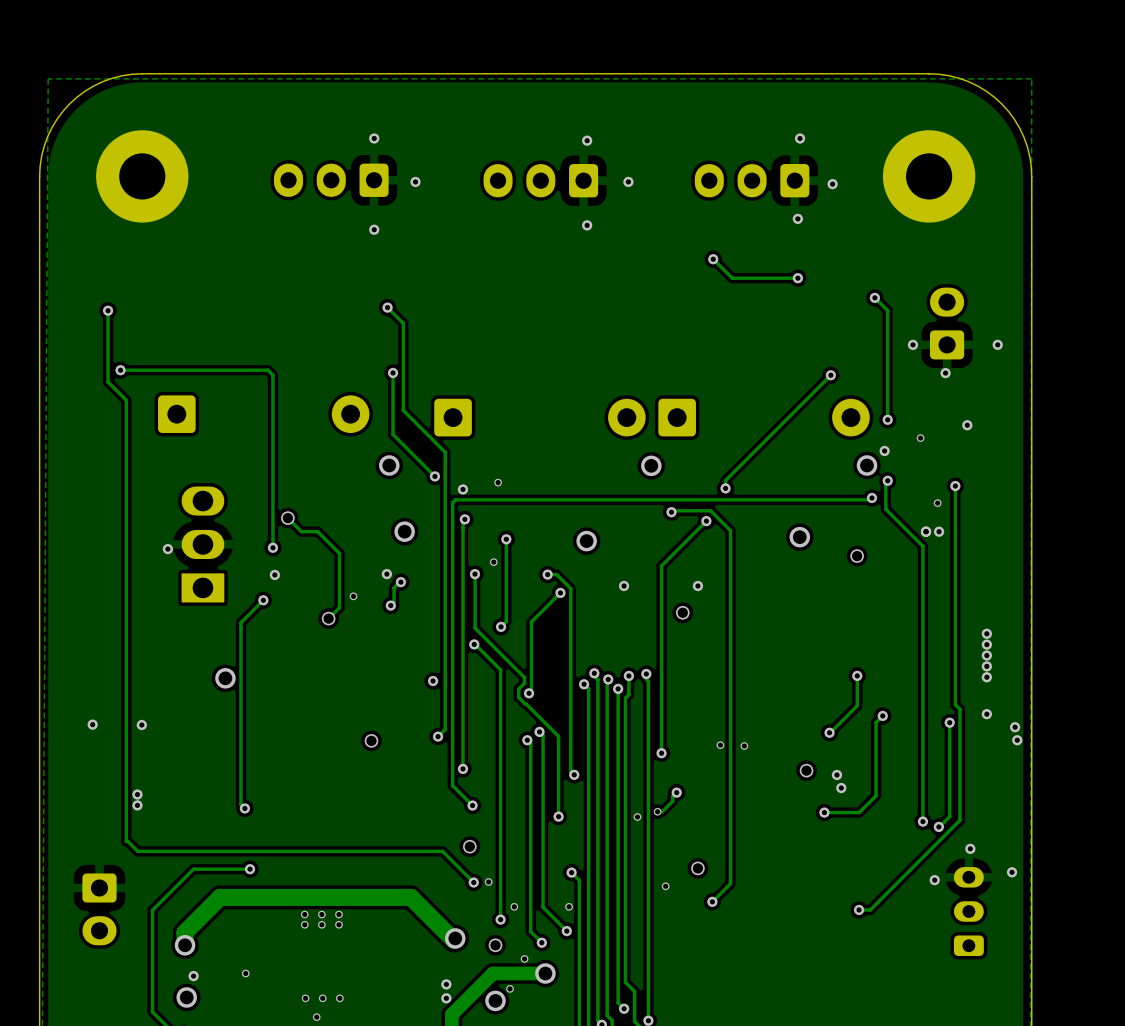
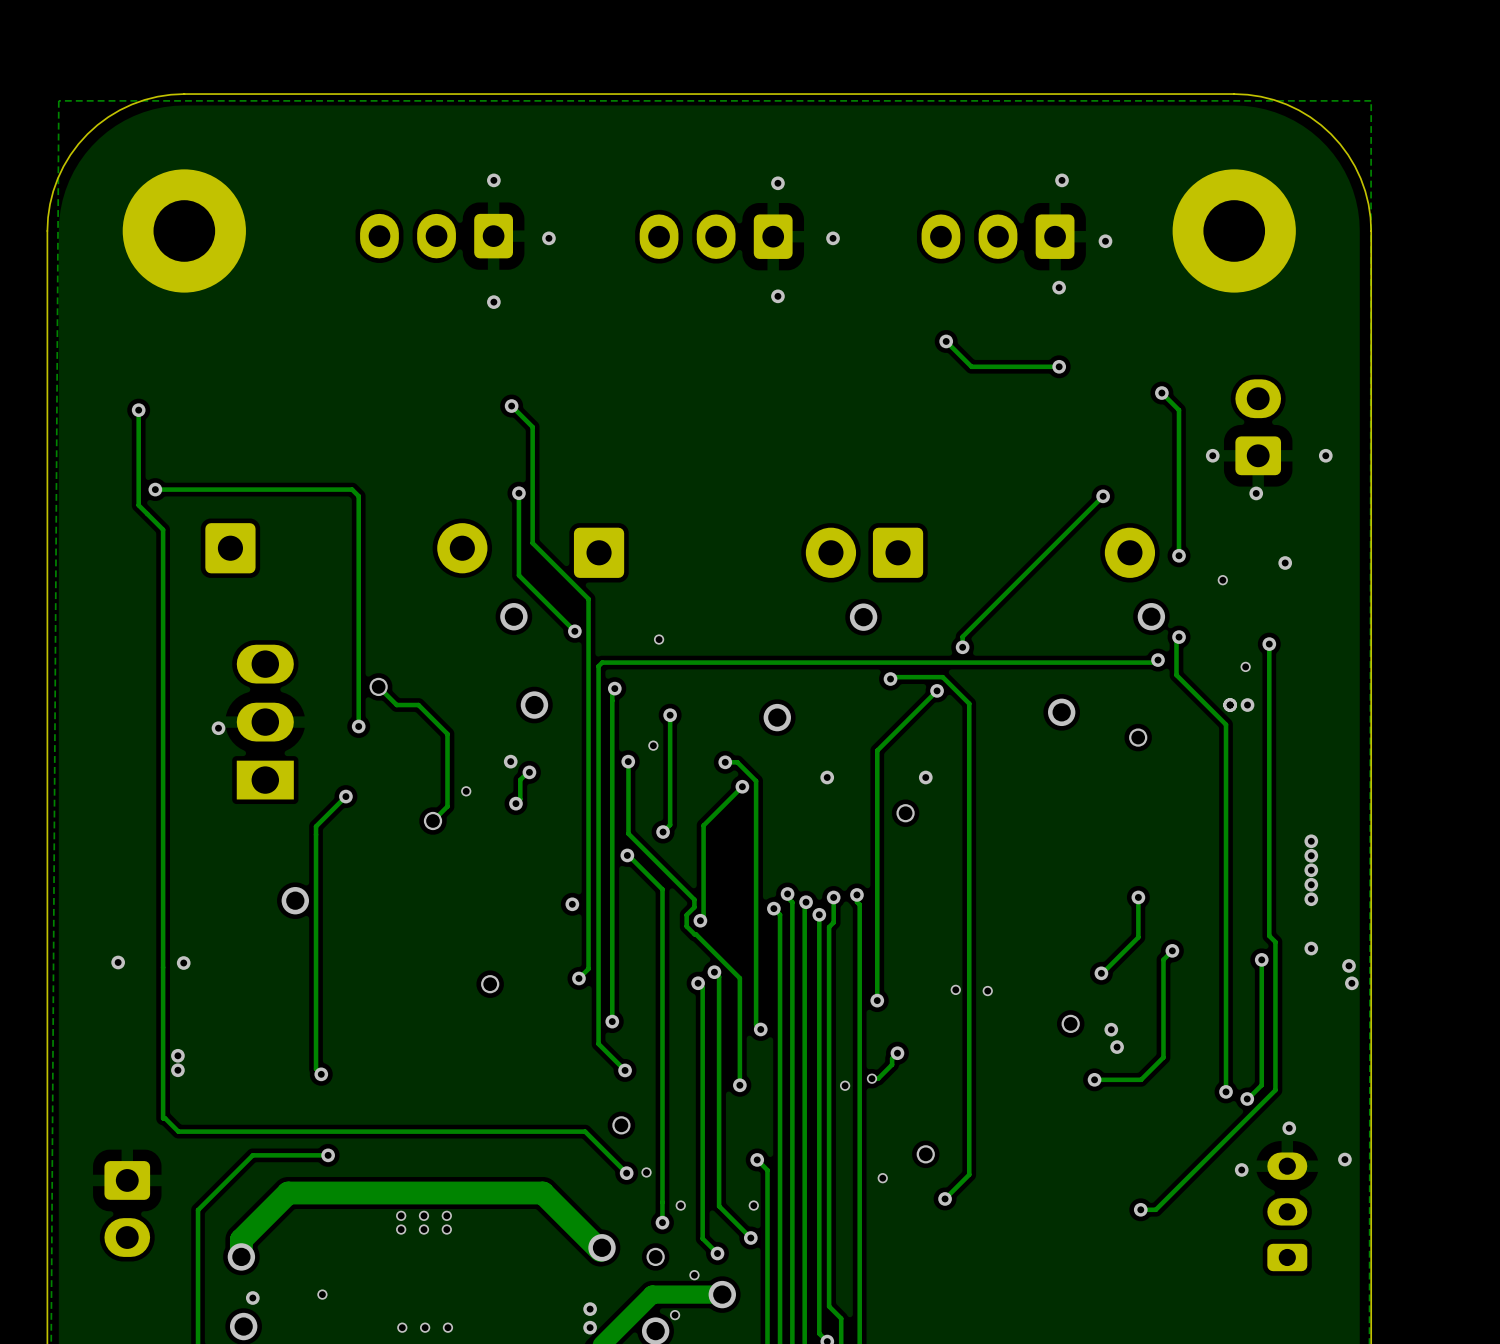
via: (884, 450) -> none
via: (462, 489) -> none
via: (274, 574) -> none

